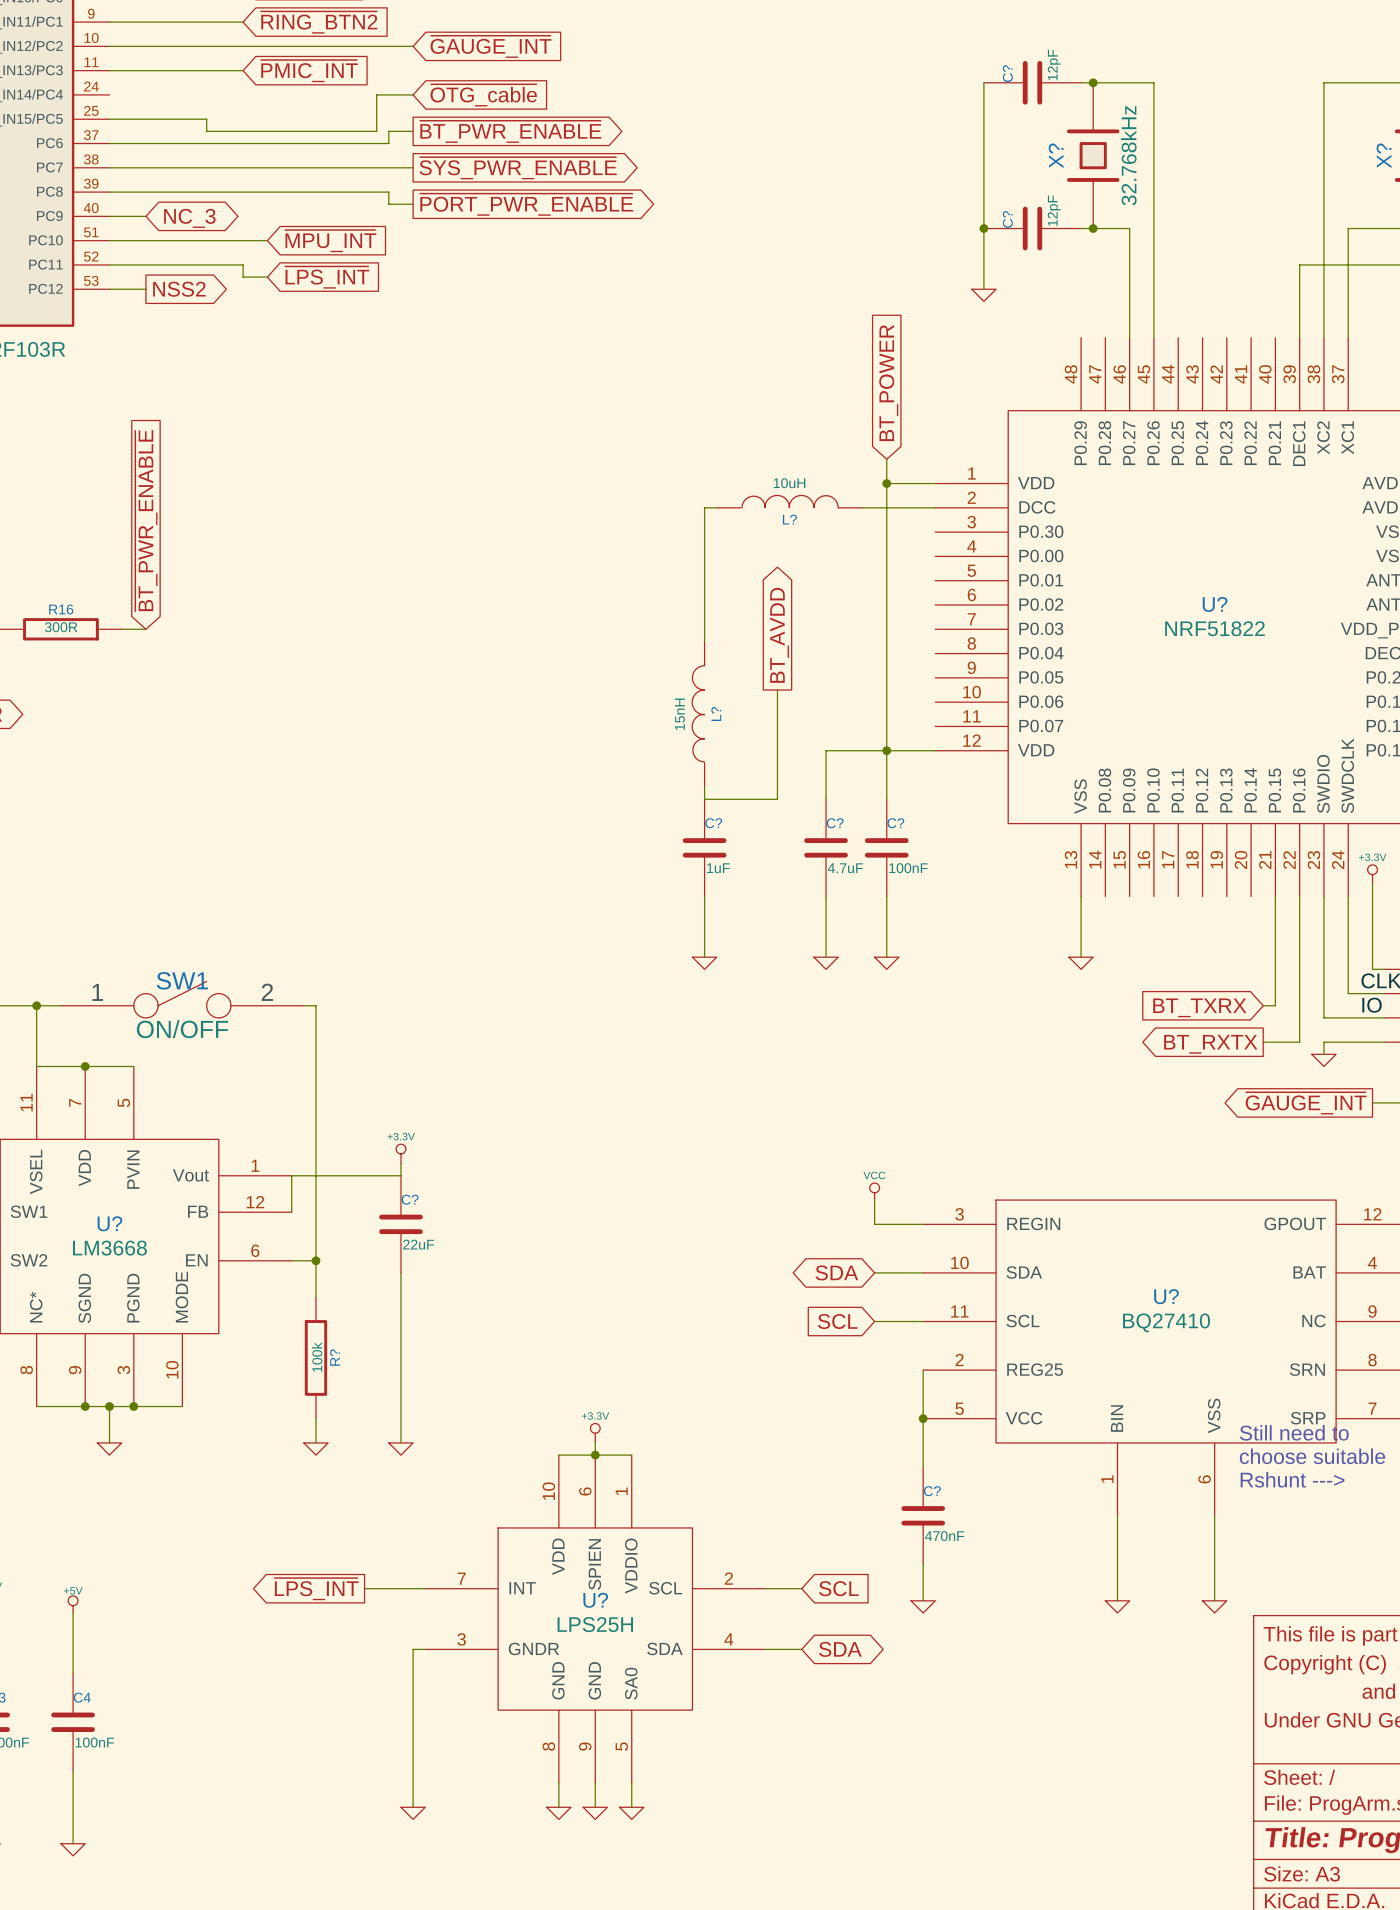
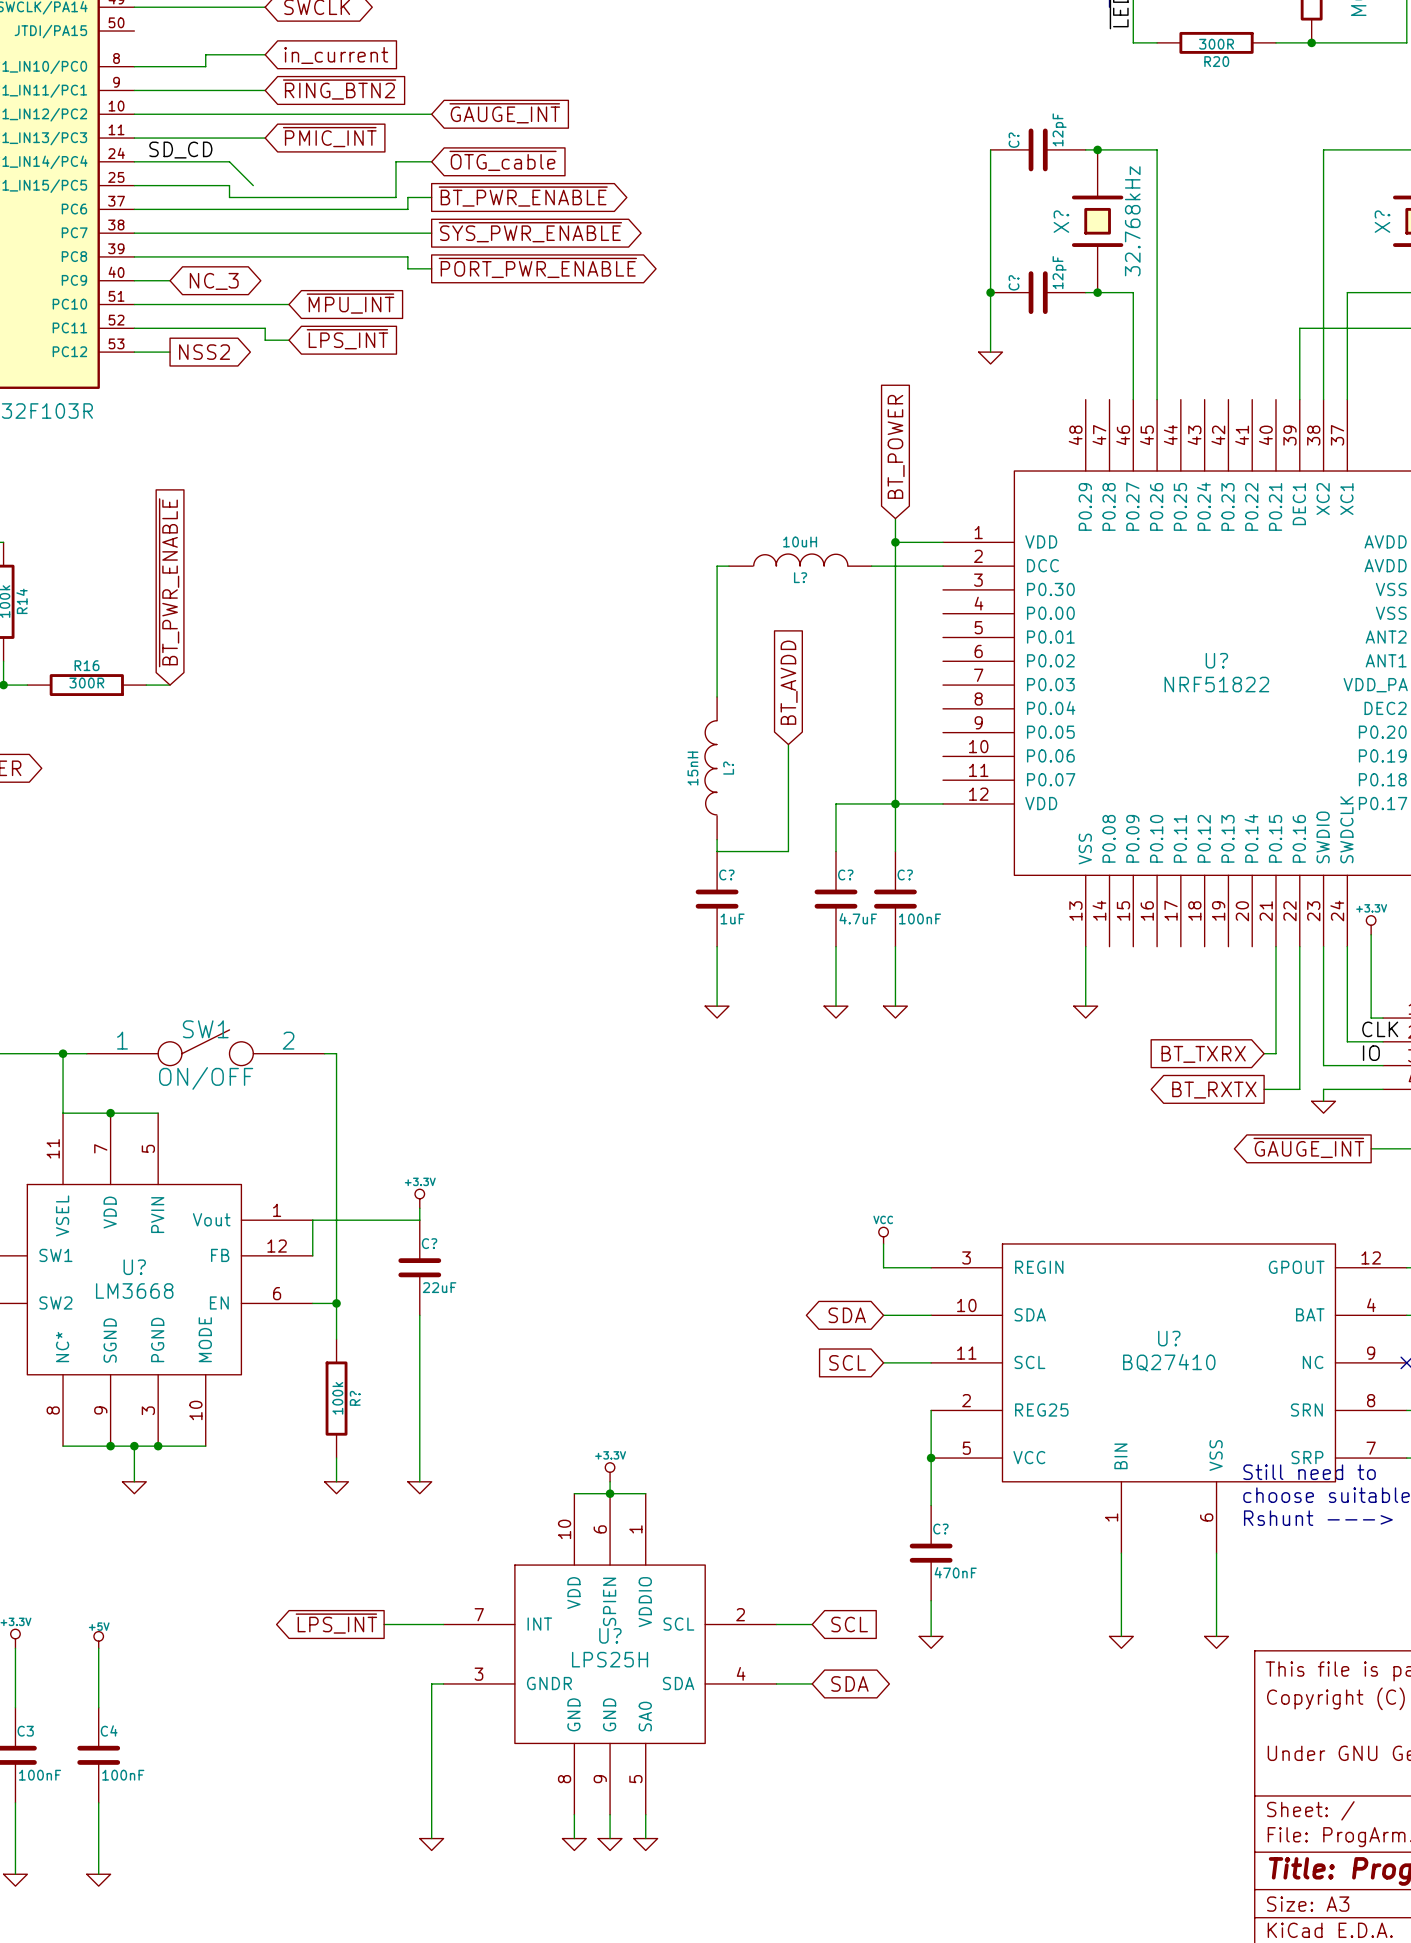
label: none -> SD_CD (180, 150)
wire: none -> (134, 161) (229, 161) (253, 185)
global label shape: output (779, 635) -> input (789, 682)

